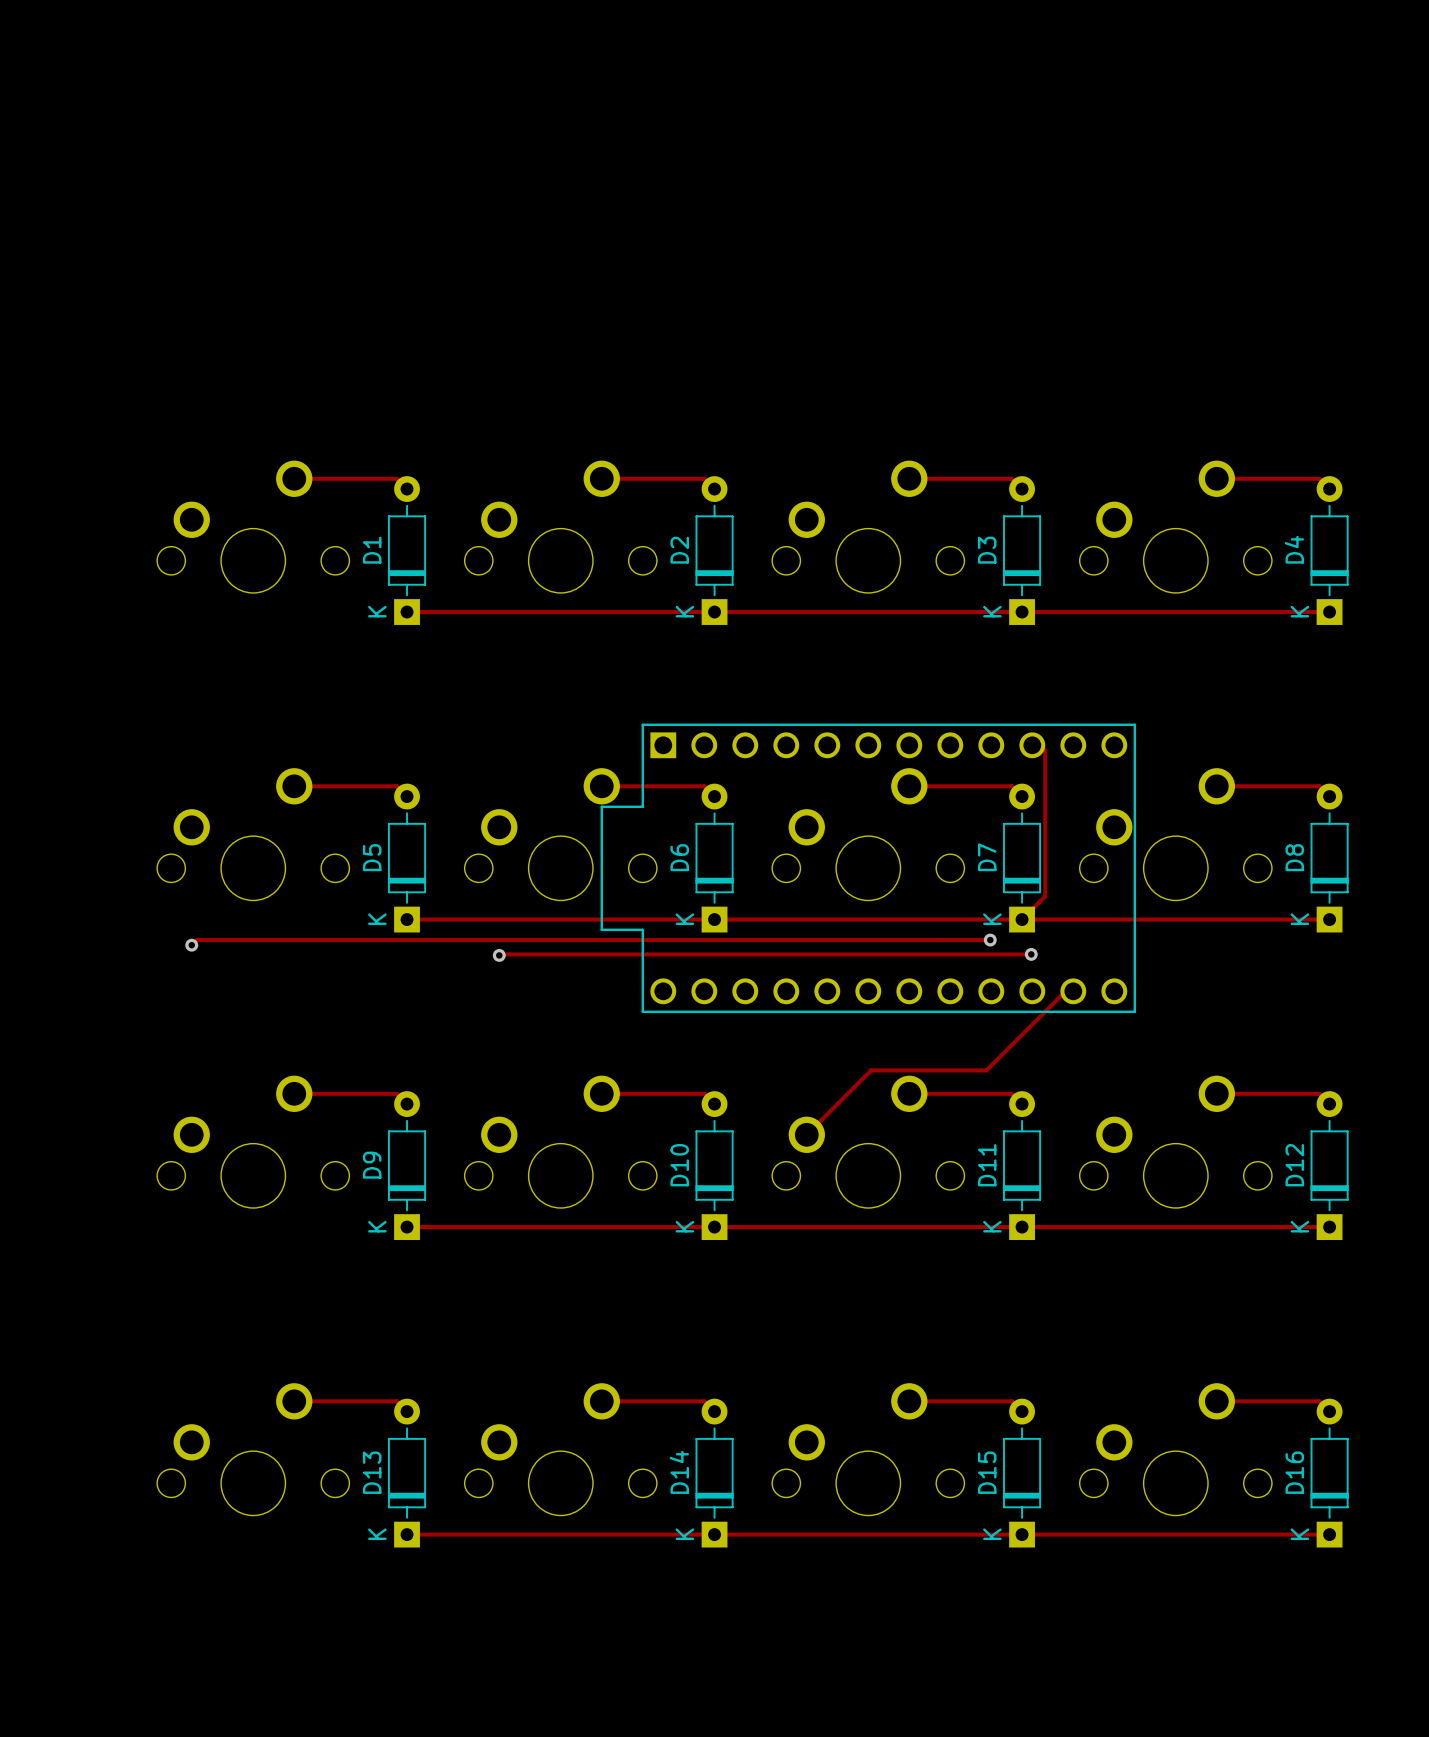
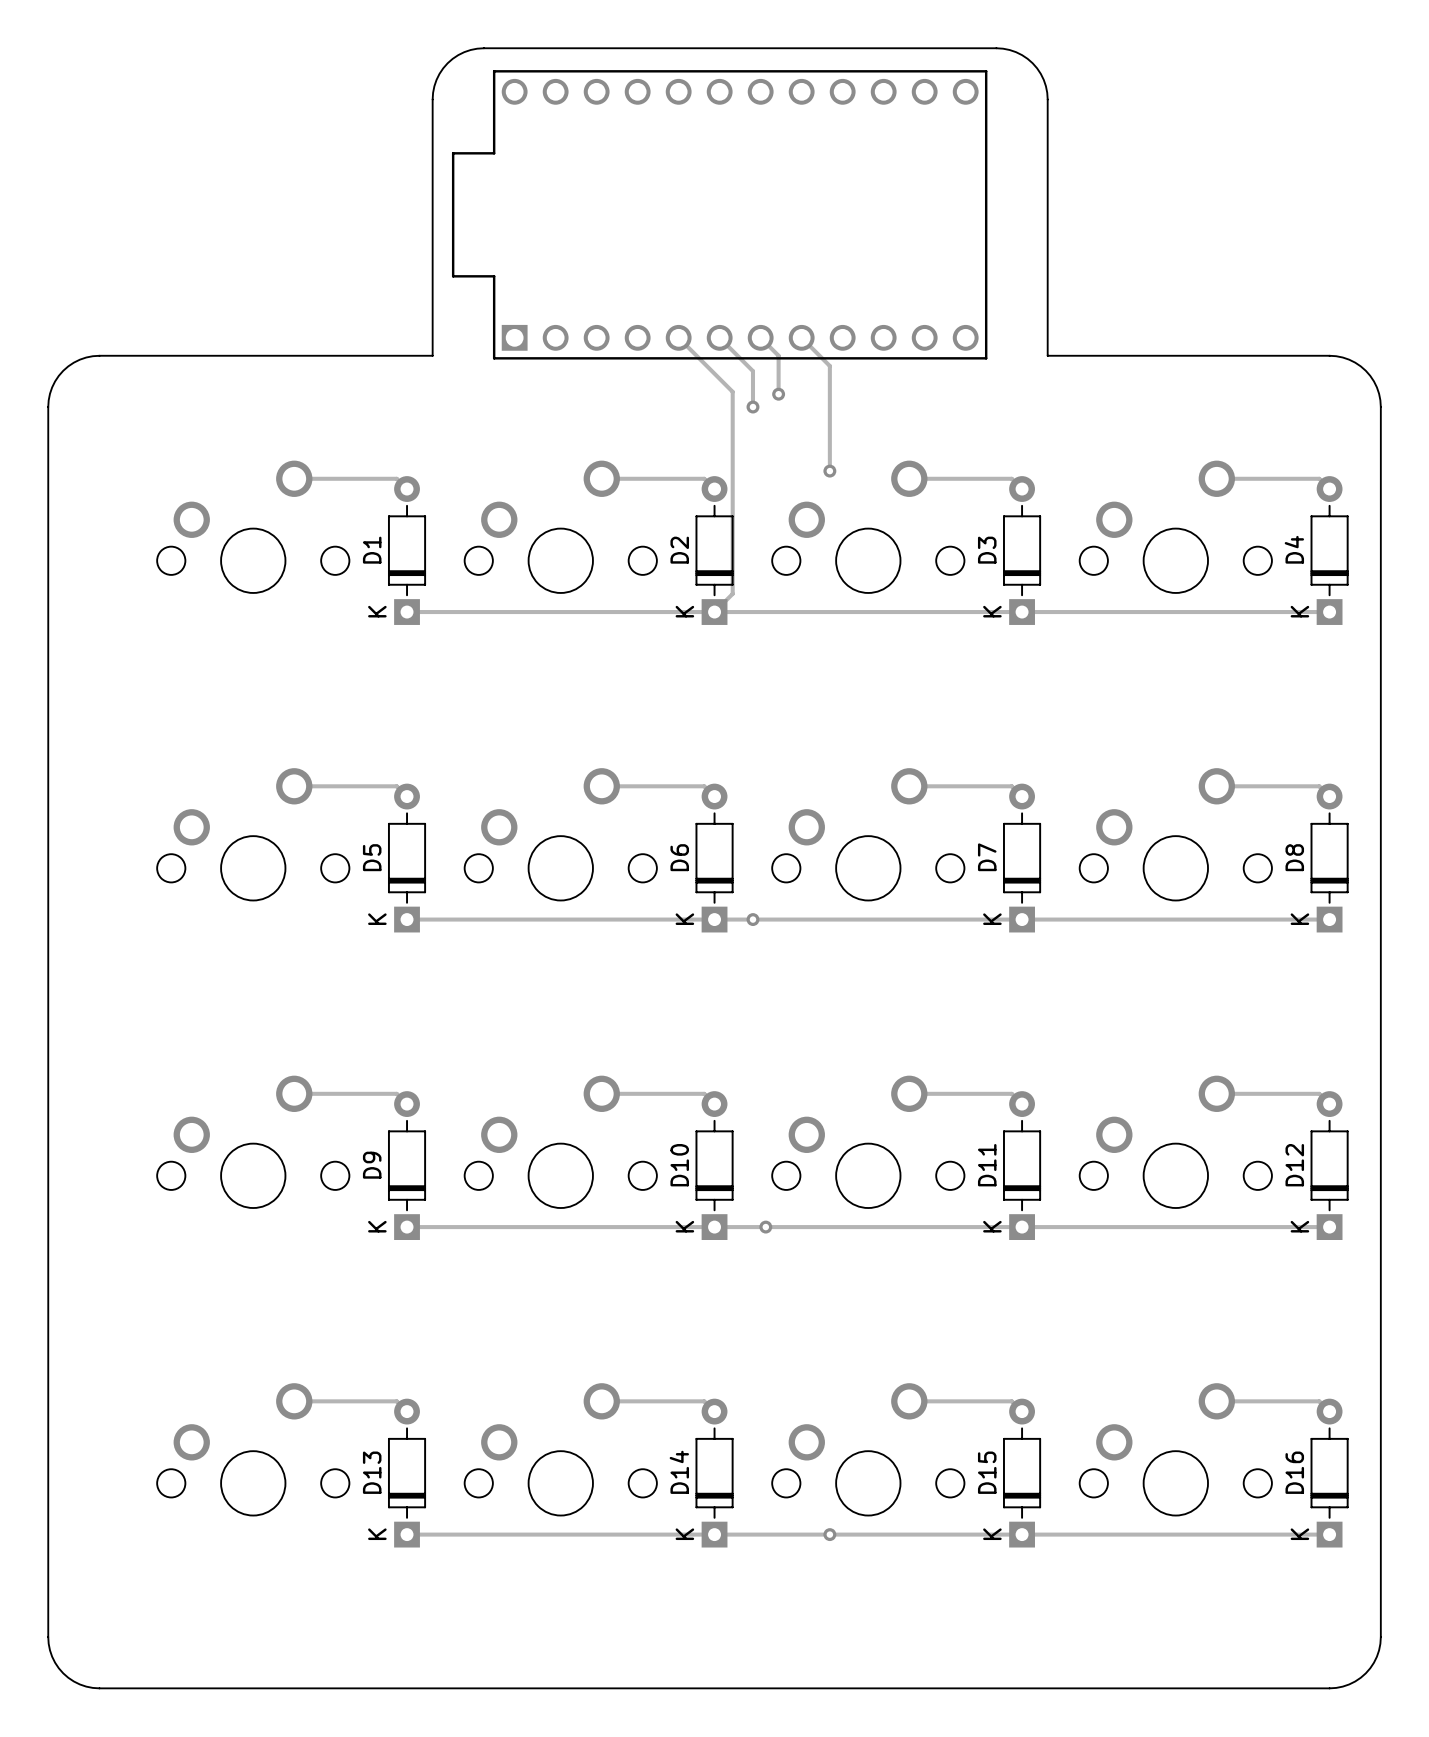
part: none -> (719, 214)
track: none -> (678, 337) (732, 391) (732, 593) (714, 612)
track: none -> (719, 337) (752, 371) (752, 407)
track: none -> (760, 337) (778, 355) (778, 394)
track: none -> (801, 337) (829, 366) (829, 471)
board edge: none -> (1329, 355) (1047, 355) (1047, 92) (1043, 79) (1037, 68) (1027, 58) (1016, 52) (996, 48) (483, 48) (464, 52) (447, 63) (439, 73) (433, 92) (432, 355) (99, 355) (79, 359) (63, 370) (52, 387) (48, 407) (48, 1637) (52, 1656) (63, 1673) (79, 1684) (99, 1688) (1329, 1688) (1349, 1684) (1365, 1673) (1376, 1656) (1380, 1637) (1380, 407) (1376, 387) (1365, 370) (1349, 359) (1329, 355)
via: none -> (778, 394)
via: none -> (752, 407)
via: none -> (829, 471)
track: (1032, 737) (1045, 750) (1045, 896) (1022, 919) -> none
part: (868, 868) -> none
via: none -> (752, 919)
track: (990, 940) (196, 940) (191, 945) -> none
via: (990, 940) -> none
via: (191, 945) -> none
track: (1031, 954) (499, 955) -> none
via: (1031, 954) -> none
via: (499, 955) -> none
track: (1073, 983) (986, 1070) (871, 1070) (806, 1134) -> none
via: none -> (765, 1227)
via: none -> (829, 1534)

